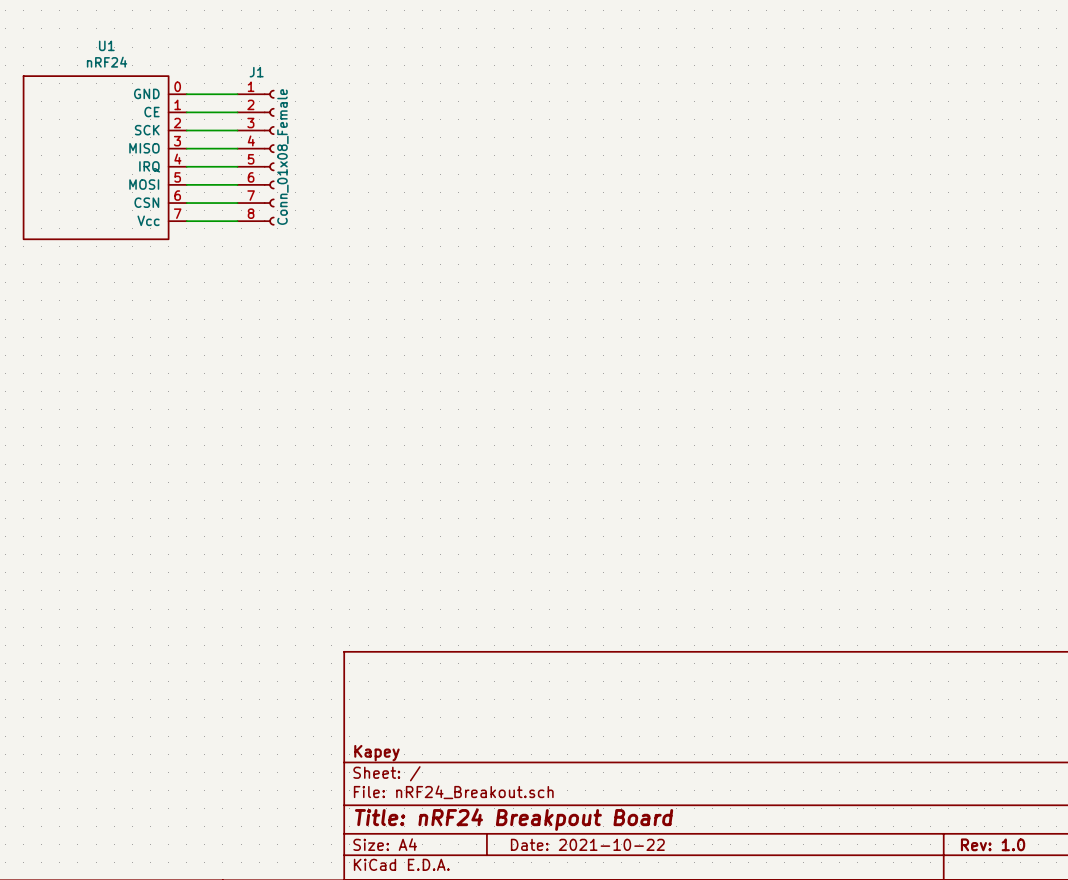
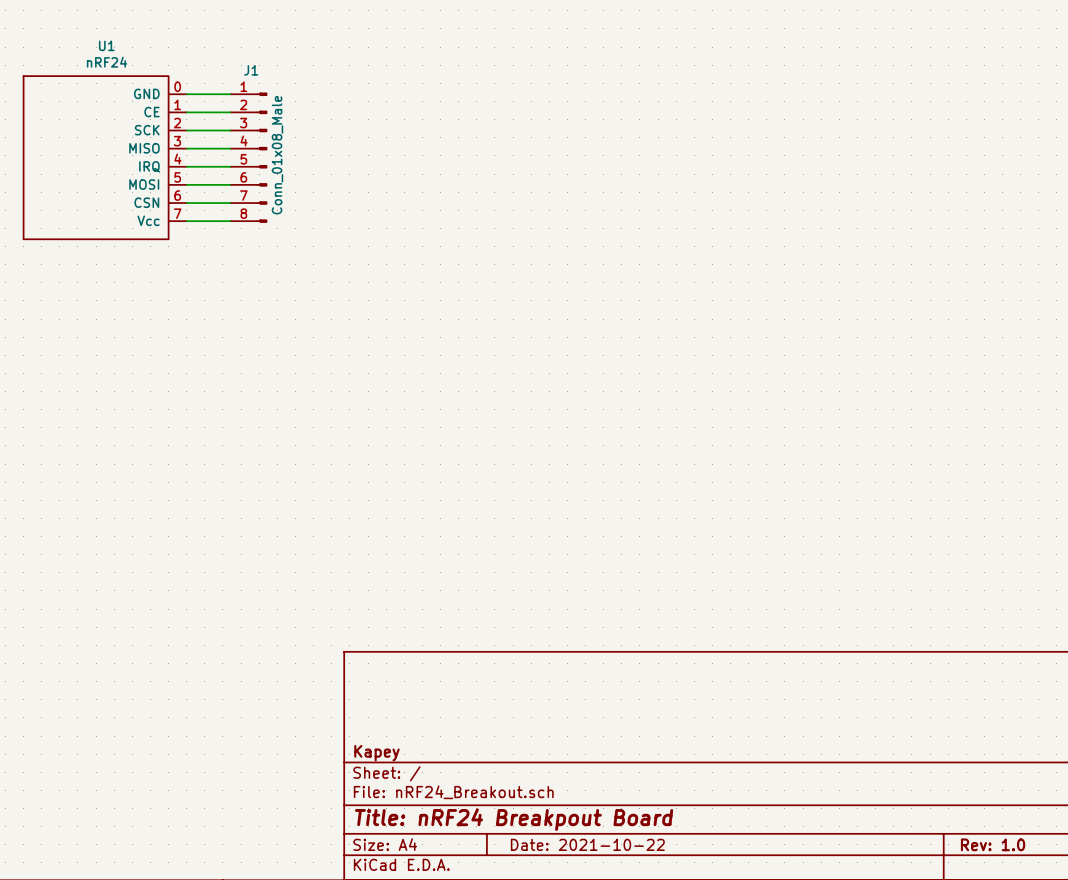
J1 symbol: [237, 90, 275, 226] -> [230, 92, 268, 223]
J1 value: Conn_01x08_Female (282, 157) -> Conn_01x08_Male (277, 155)

